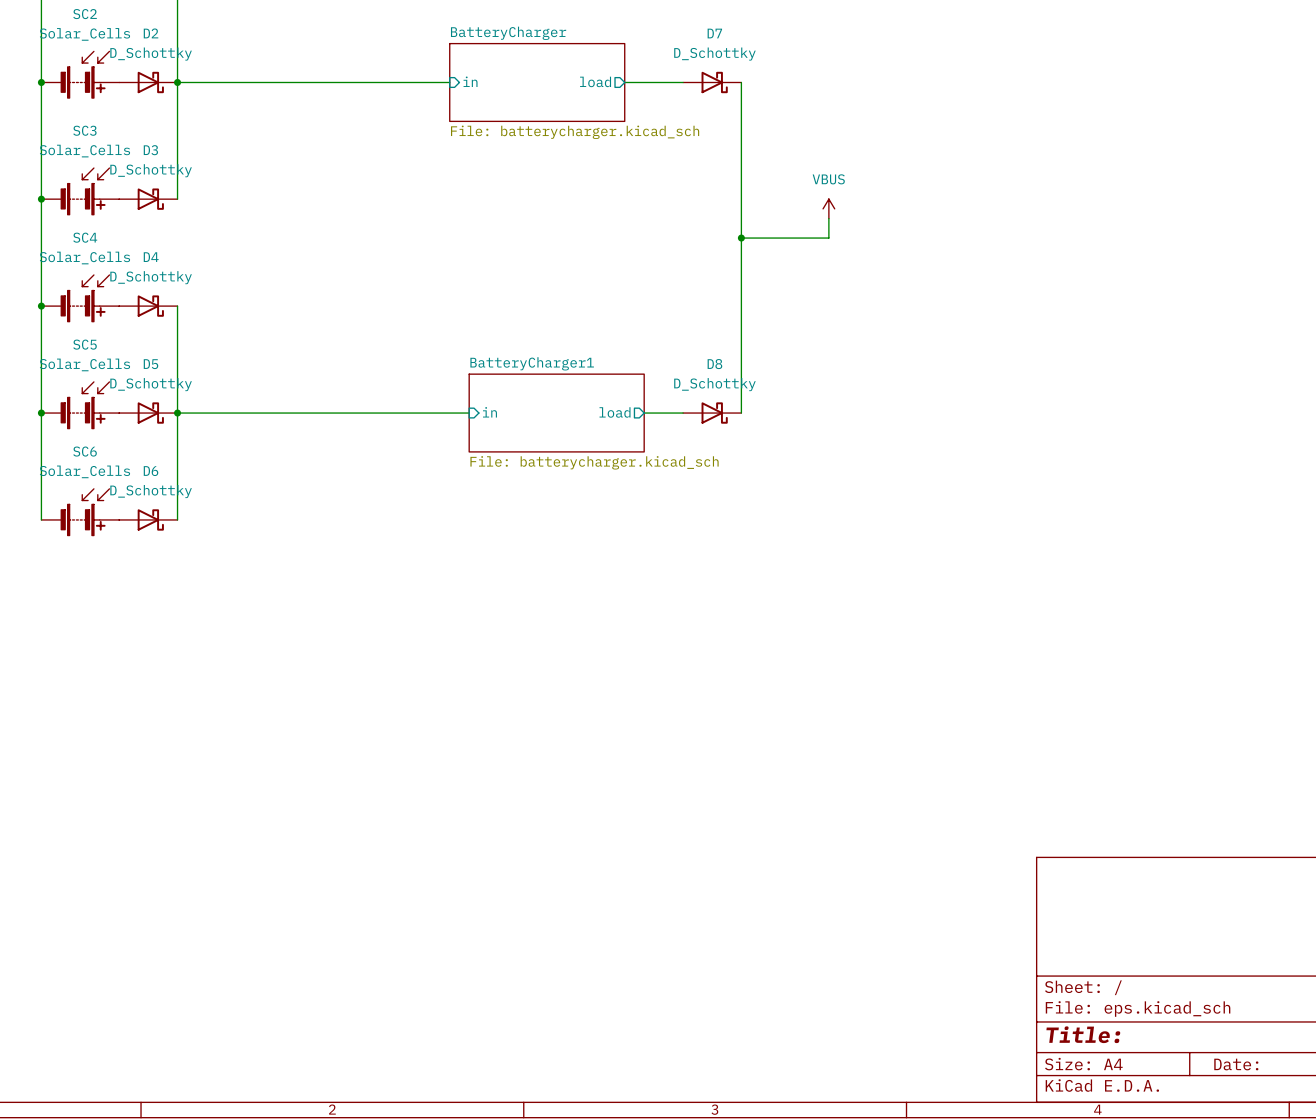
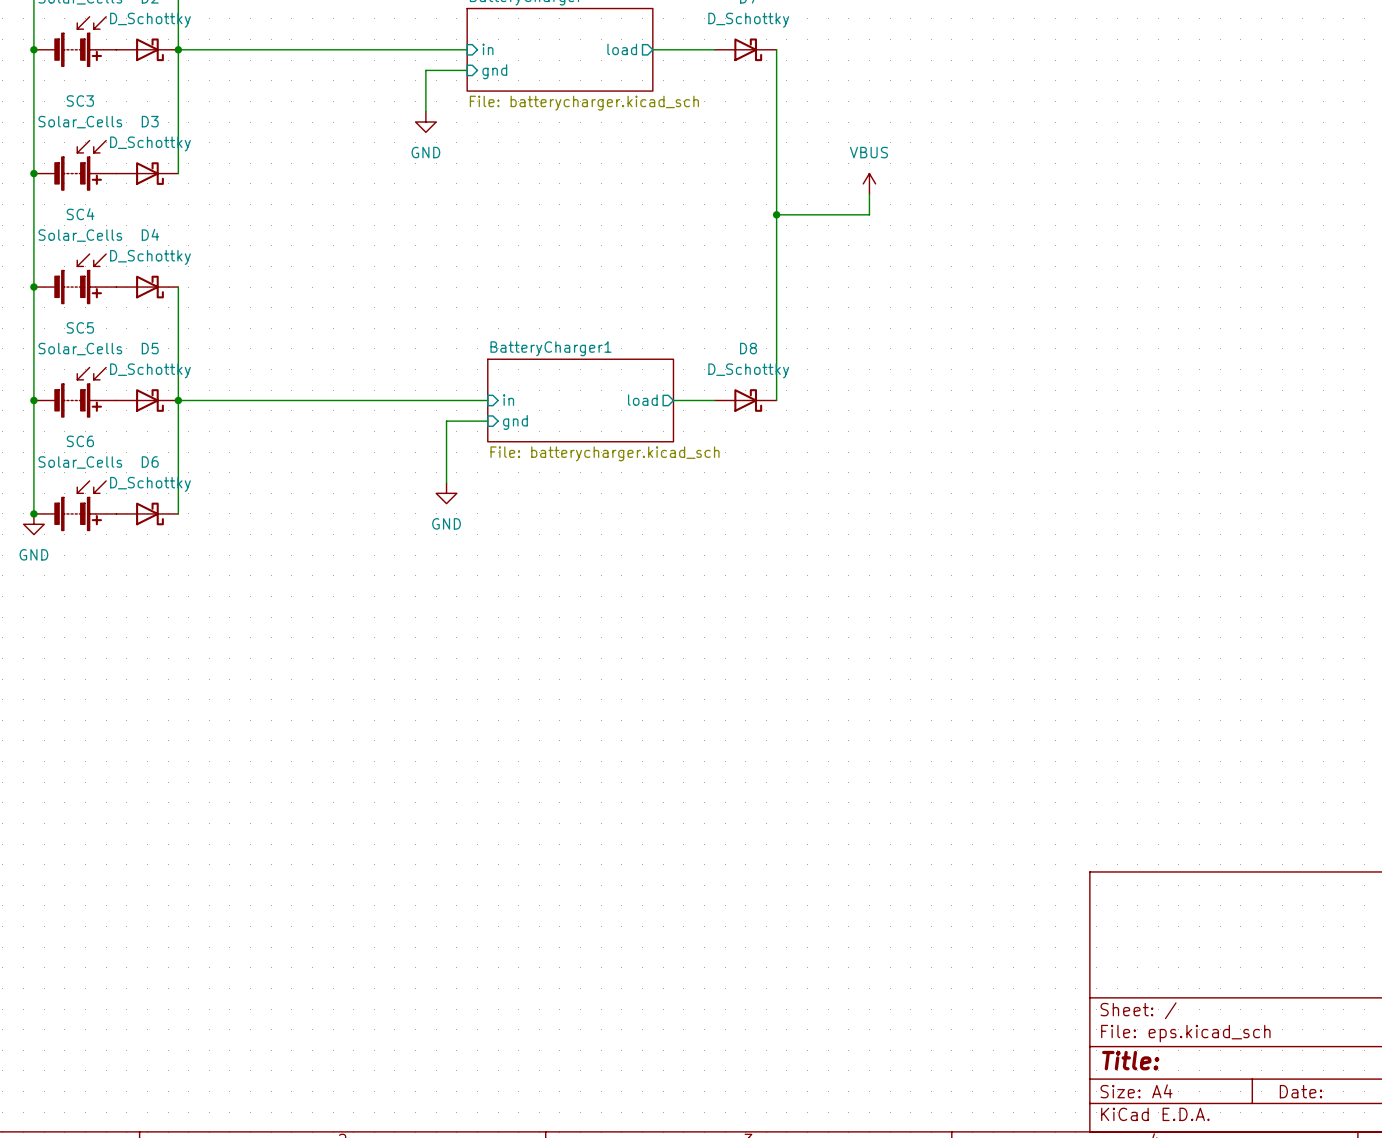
wire: none -> (467, 70) (425, 70) (425, 111)
sheet pin: none -> gnd (494, 71)
power symbol: none -> GND (425, 122)
wire: none -> (487, 421) (446, 421) (446, 483)
sheet pin: none -> gnd (515, 422)
power symbol: none -> GND (446, 493)
junction: none -> (33, 513)
power symbol: none -> GND (33, 524)

